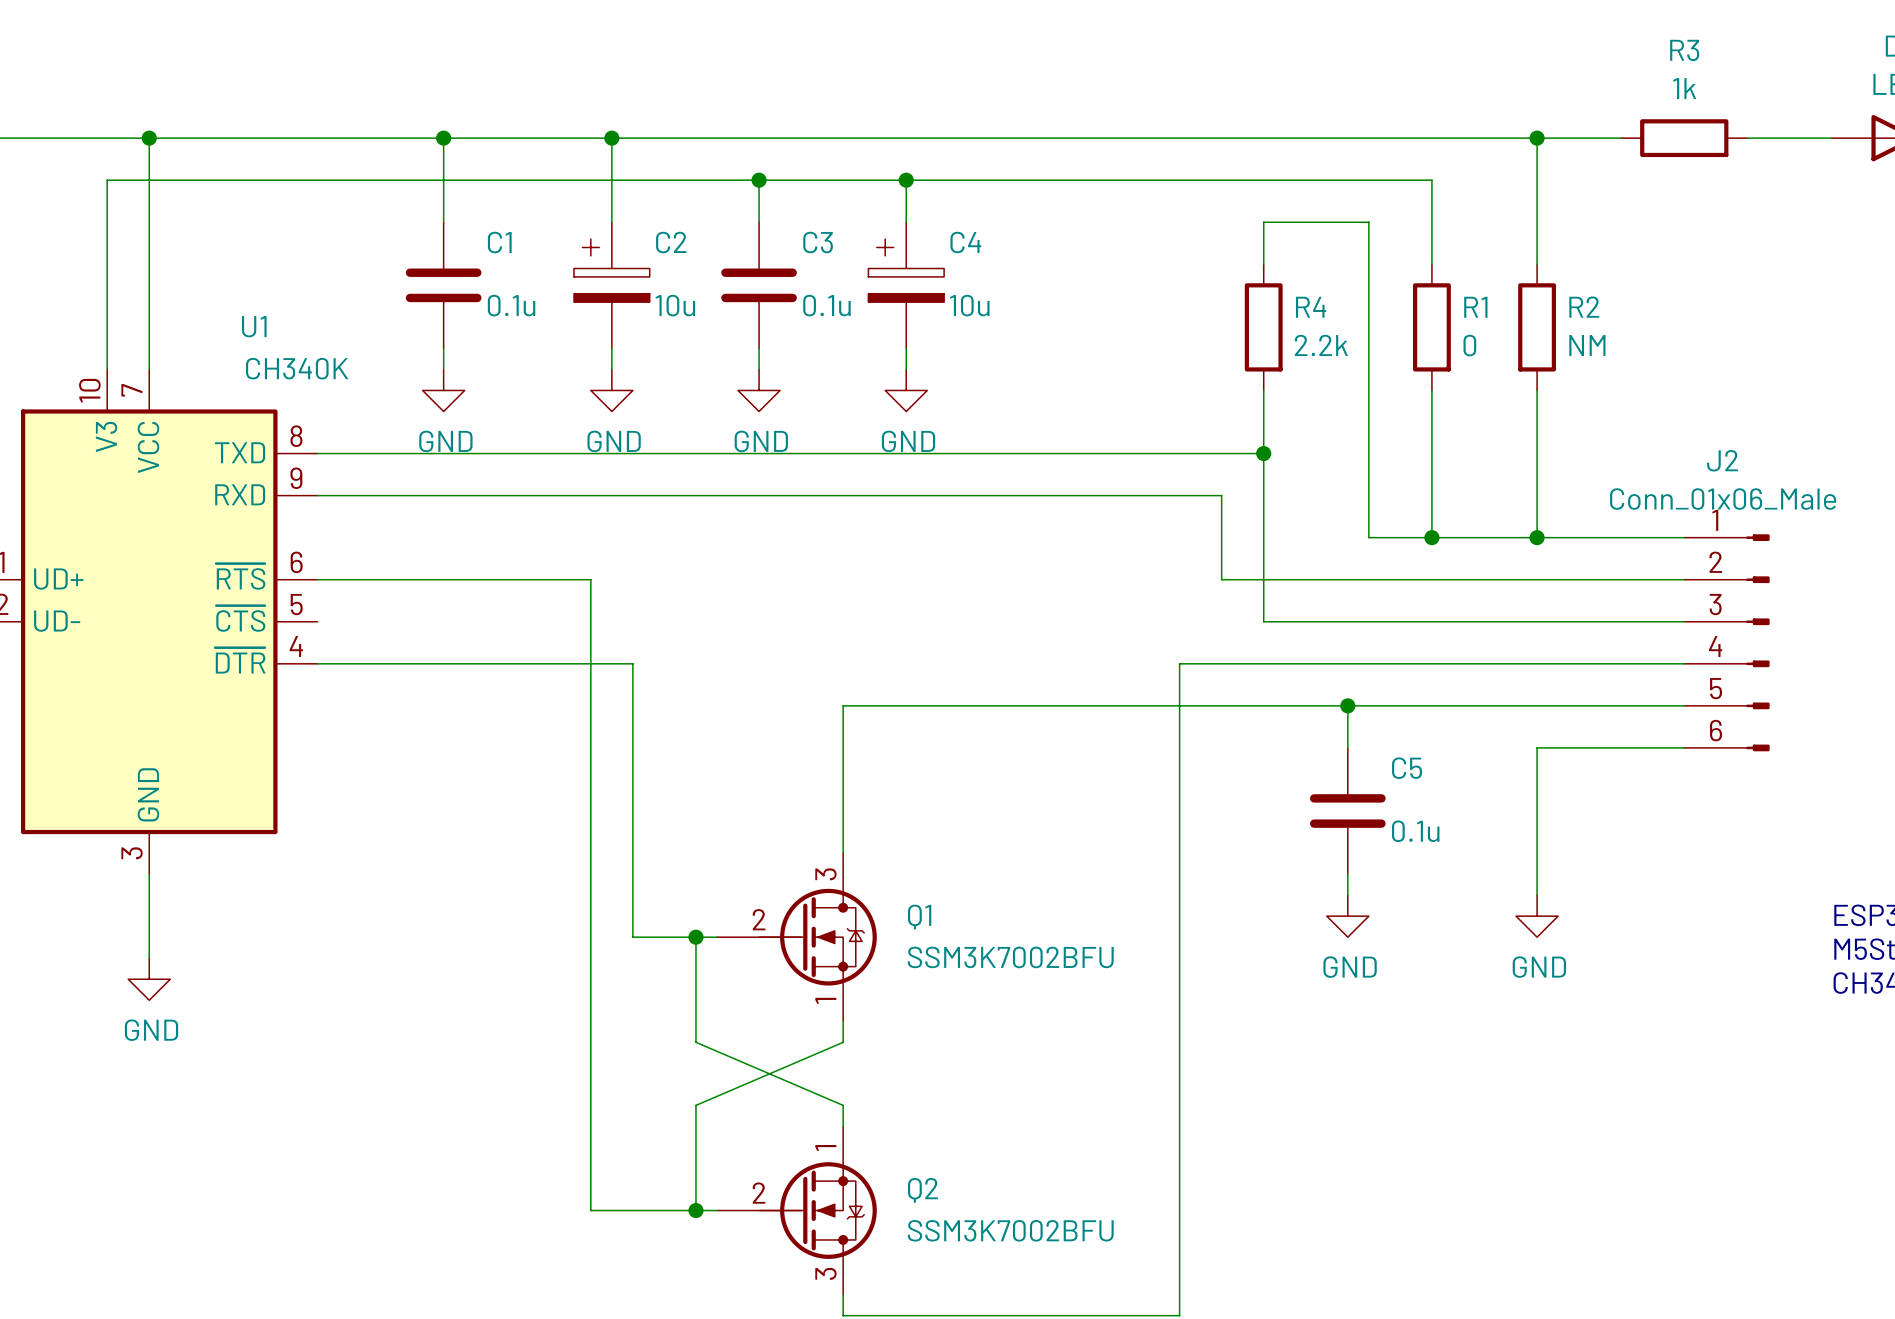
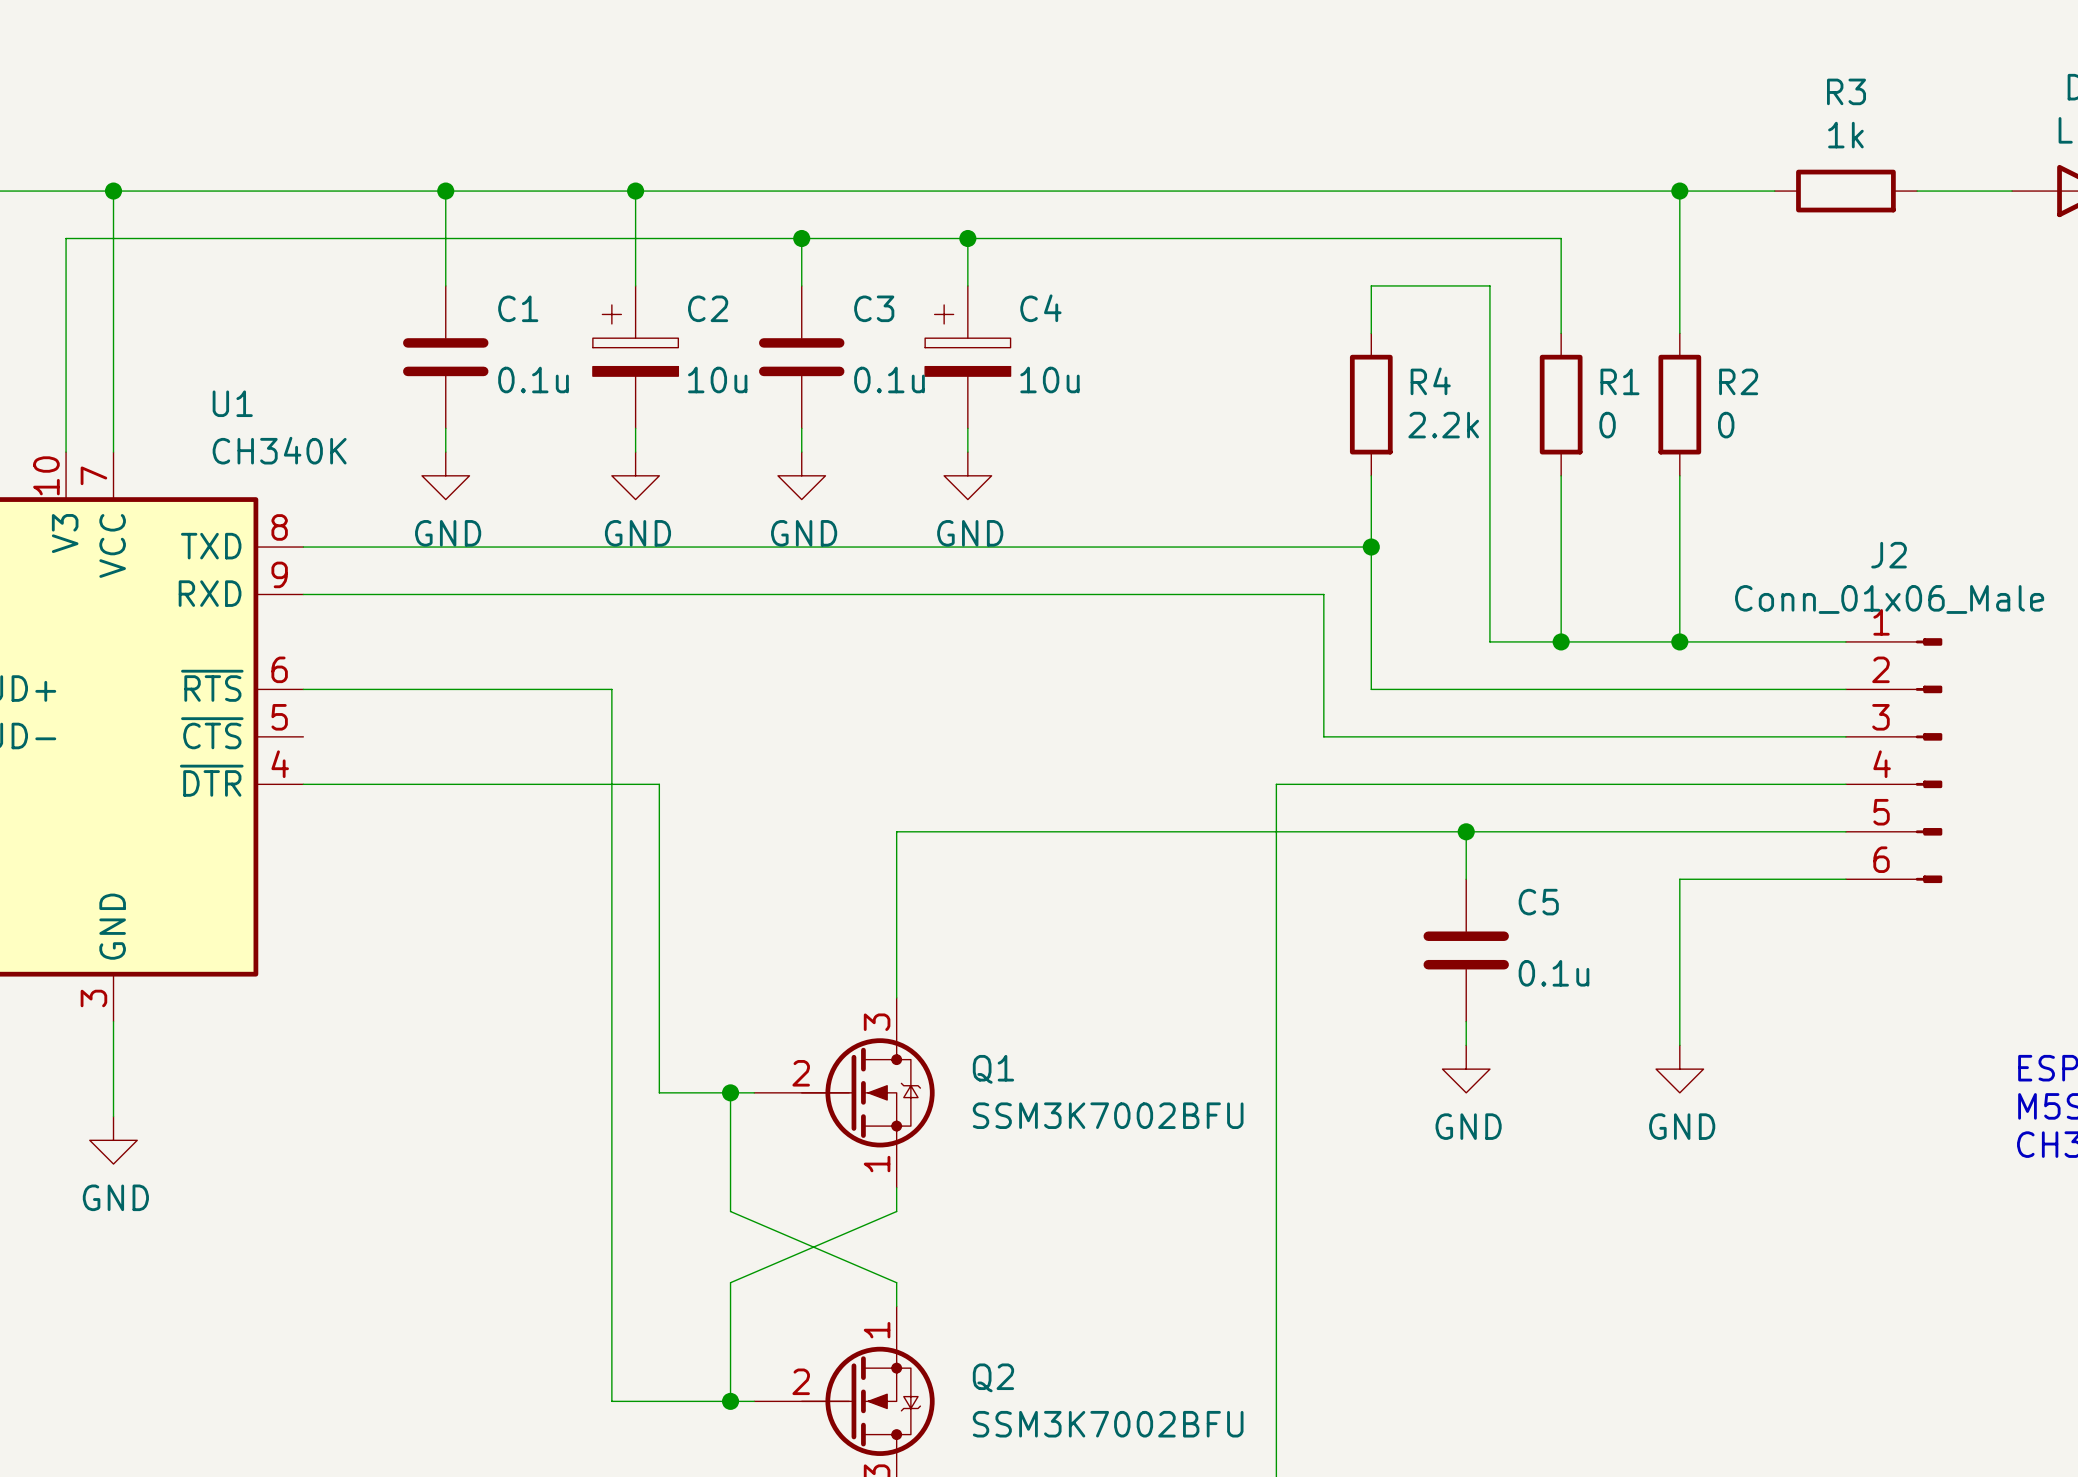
R2 value: NM (1587, 345) -> 0 (1726, 425)
wire: (1221, 579) (1263, 579) (1263, 621) -> (1323, 689) (1323, 736) (1371, 736)

